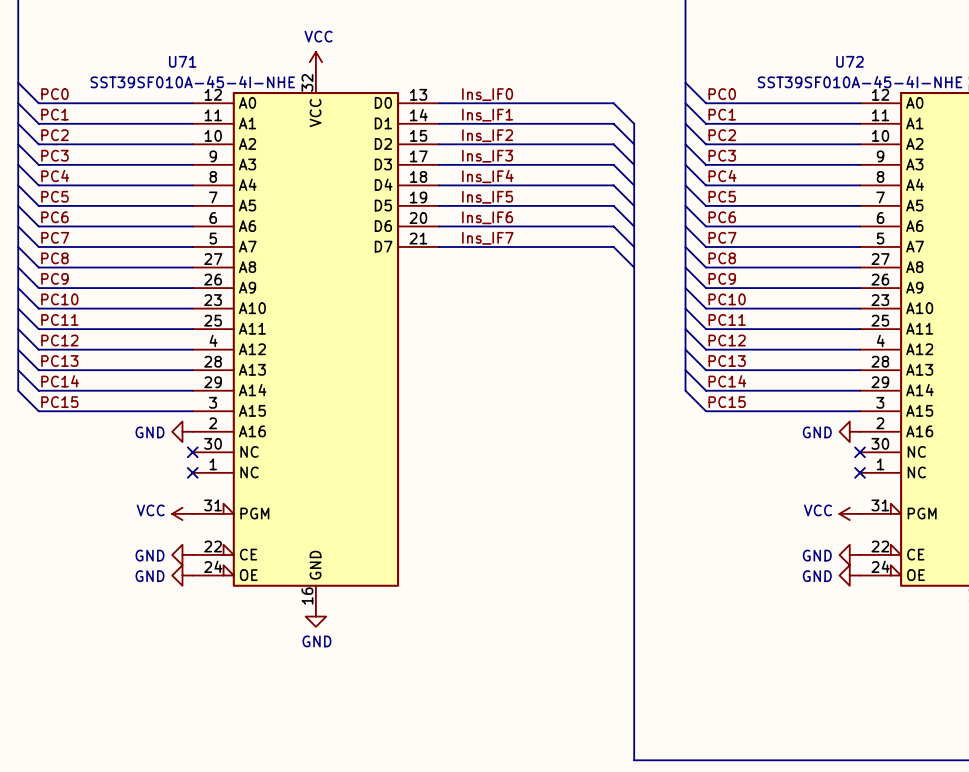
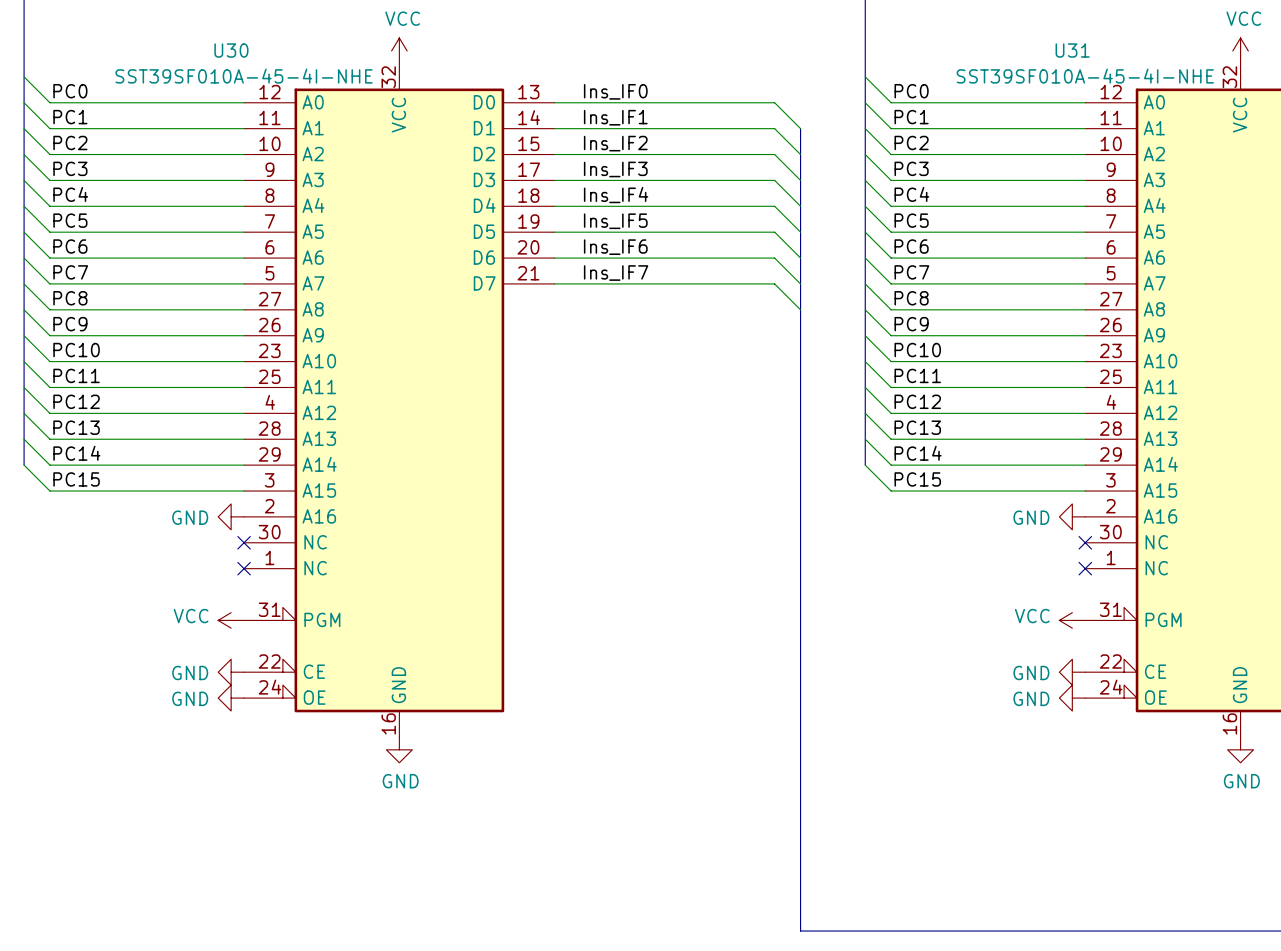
U71 name: U71 (182, 61) -> U30 (231, 50)
U72 name: U72 (850, 61) -> U31 (1072, 50)

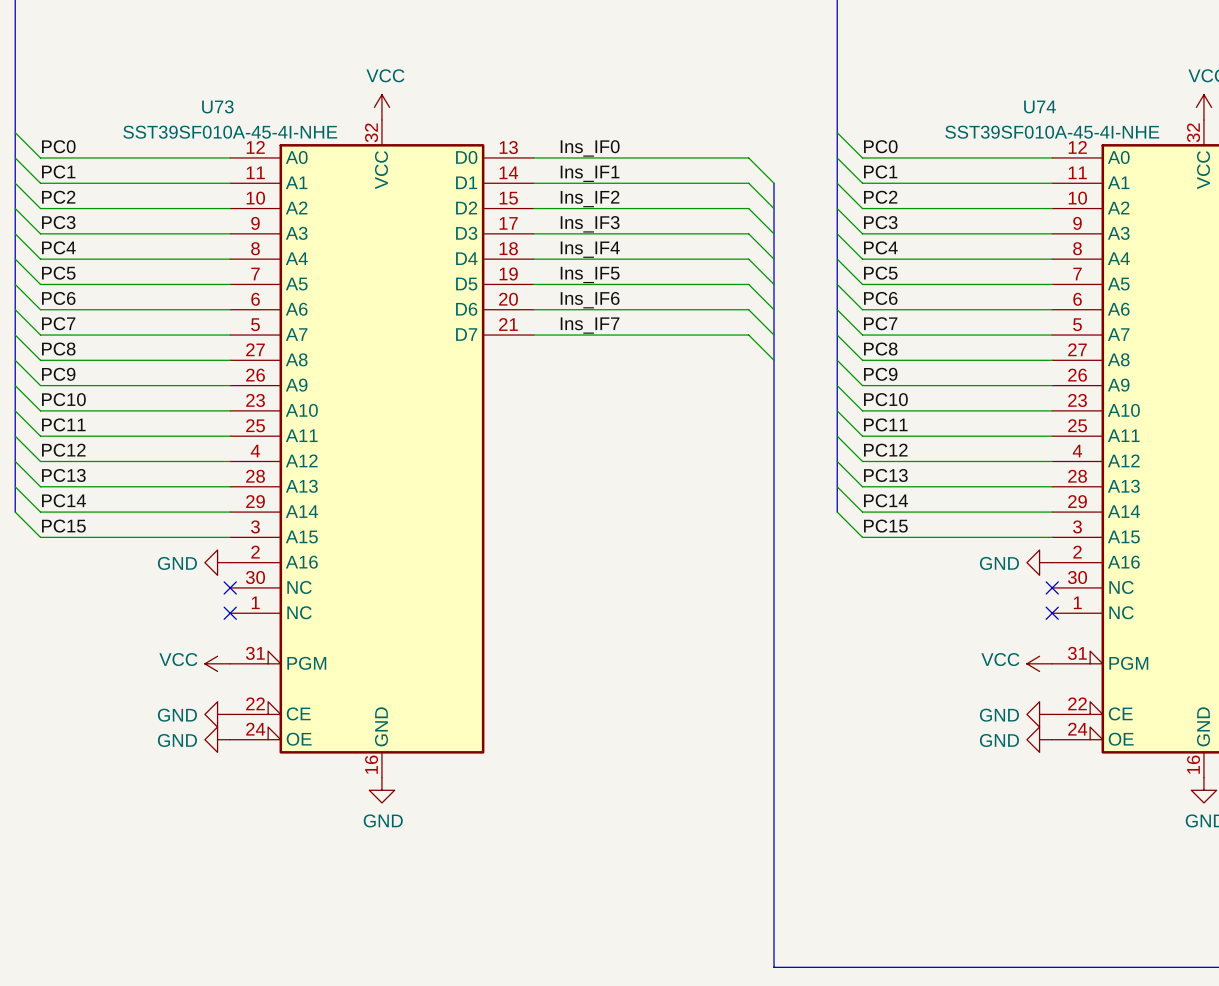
U30 name: U30 (231, 50) -> U73 (217, 106)
U31 name: U31 (1072, 50) -> U74 (1040, 107)

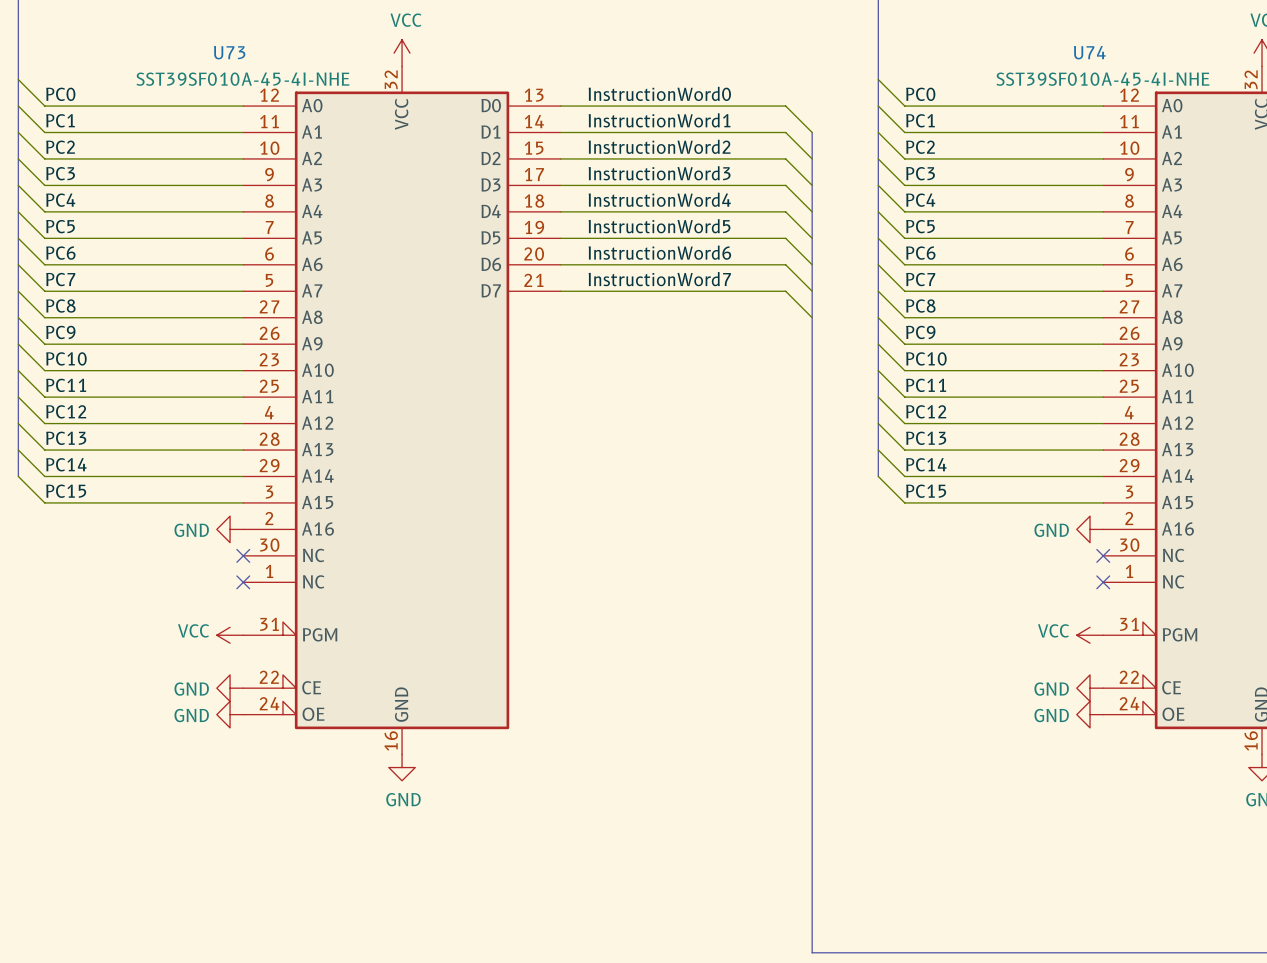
label: Ins_IF0 (590, 148) -> InstructionWord0 (659, 93)
label: Ins_IF1 (590, 173) -> InstructionWord1 (659, 120)
label: Ins_IF2 (590, 199) -> InstructionWord2 (659, 146)
label: Ins_IF3 (590, 224) -> InstructionWord3 (659, 173)
label: Ins_IF4 (590, 249) -> InstructionWord4 (659, 199)
label: Ins_IF5 (590, 274) -> InstructionWord5 (659, 226)
label: Ins_IF6 (590, 300) -> InstructionWord6 (659, 252)
label: Ins_IF7 (590, 325) -> InstructionWord7 (659, 279)

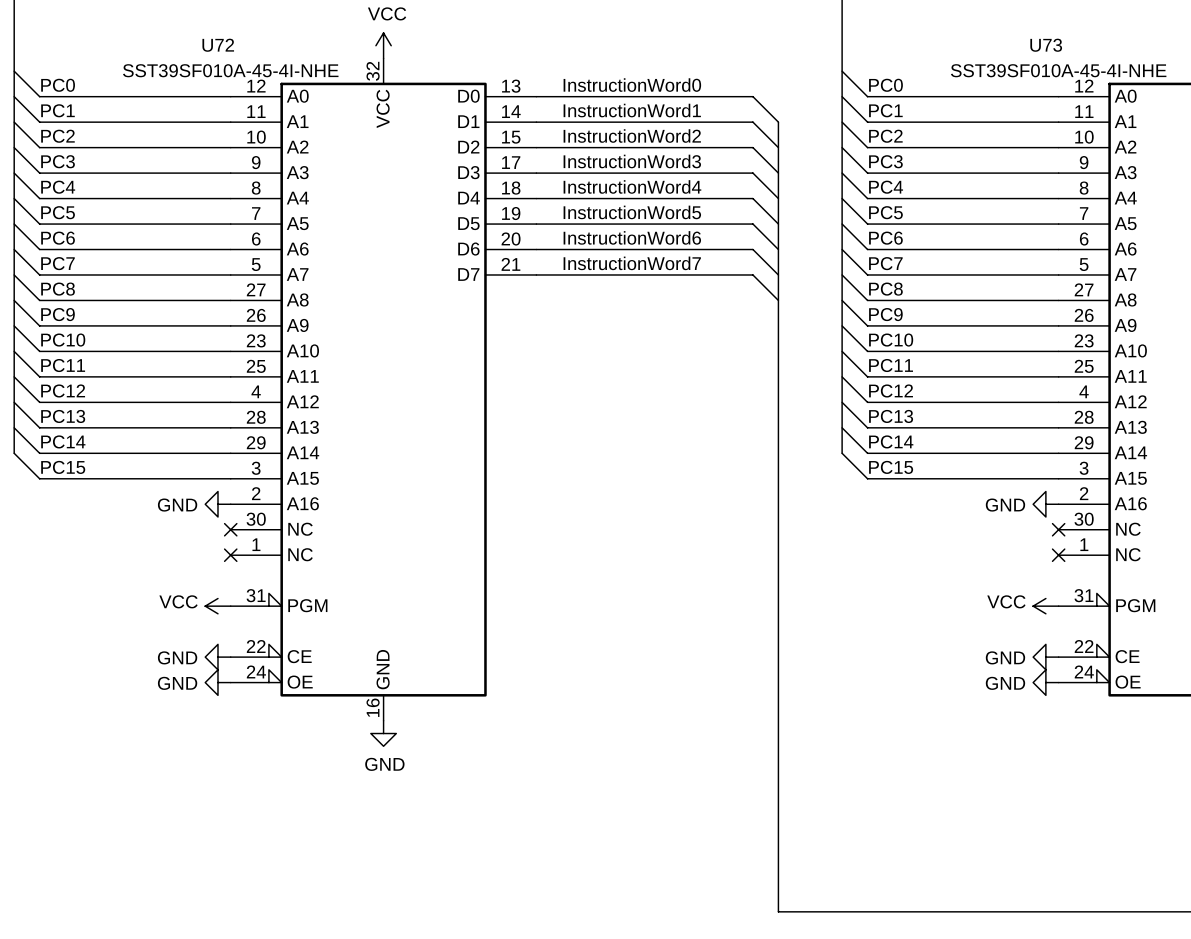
U73 name: U73 (229, 52) -> U72 (218, 45)
U74 name: U74 (1089, 52) -> U73 (1046, 45)

